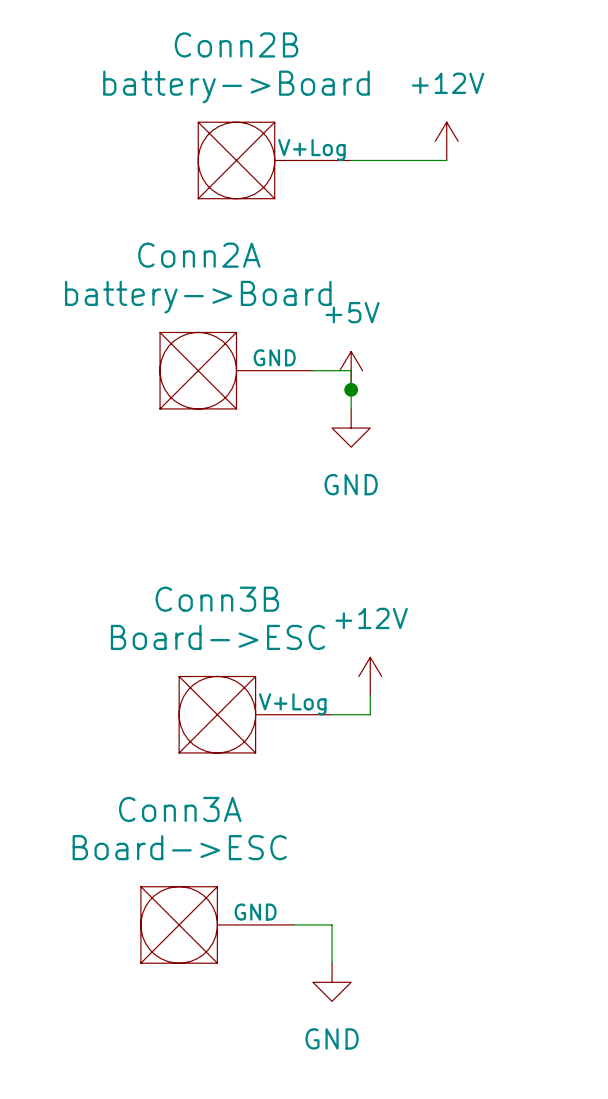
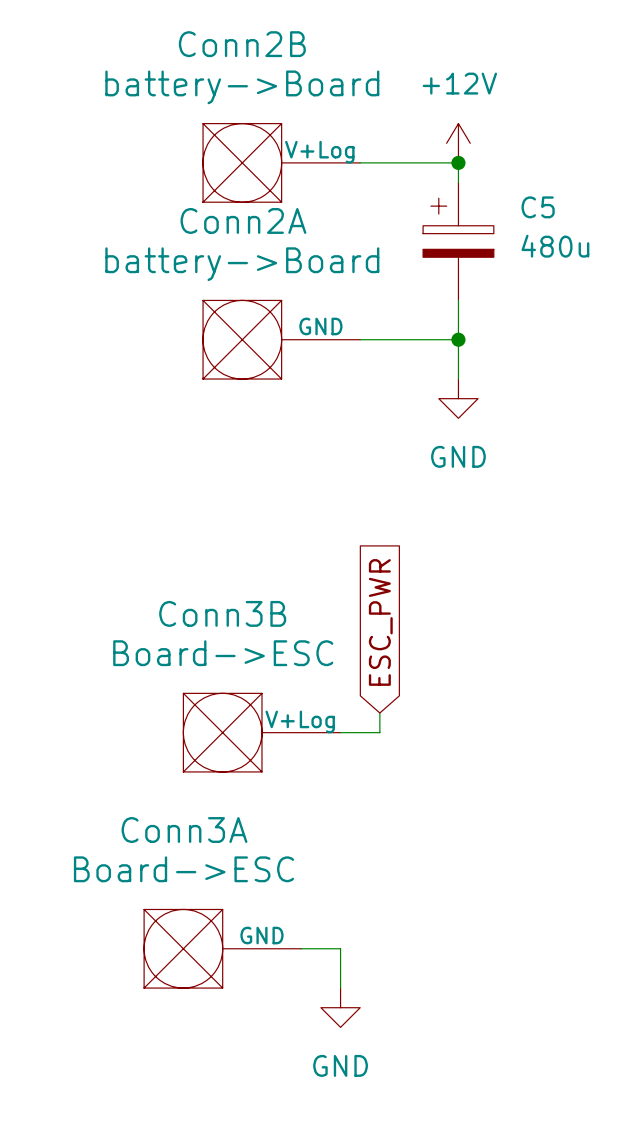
wire: none -> (458, 162) (458, 182)
junction: none -> (458, 162)
C5: none -> 480u (458, 241)
wire: none -> (458, 300) (458, 379)
wire: none -> (360, 339) (458, 339)
junction: none -> (458, 339)
Conn2A position: (236, 370) -> (281, 339)
wire: (312, 370) (351, 370) (351, 408) -> none
power symbol: +5V (351, 370) -> none
junction: (351, 389) -> none
power symbol position: GND (351, 428) -> GND (458, 398)
global label: none -> ESC_PWR (380, 622)
power symbol: +12V (370, 676) -> none

